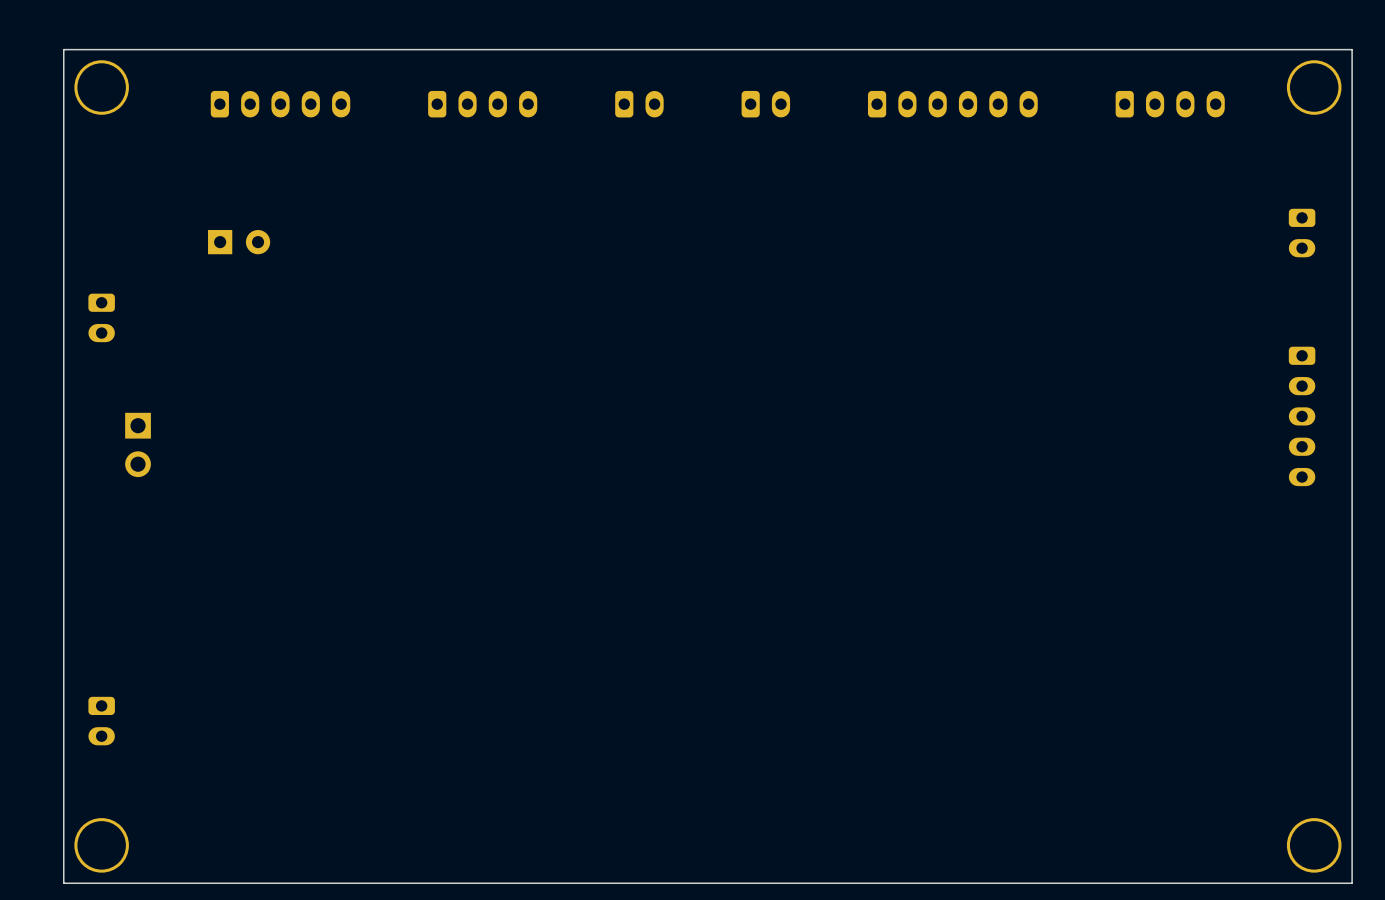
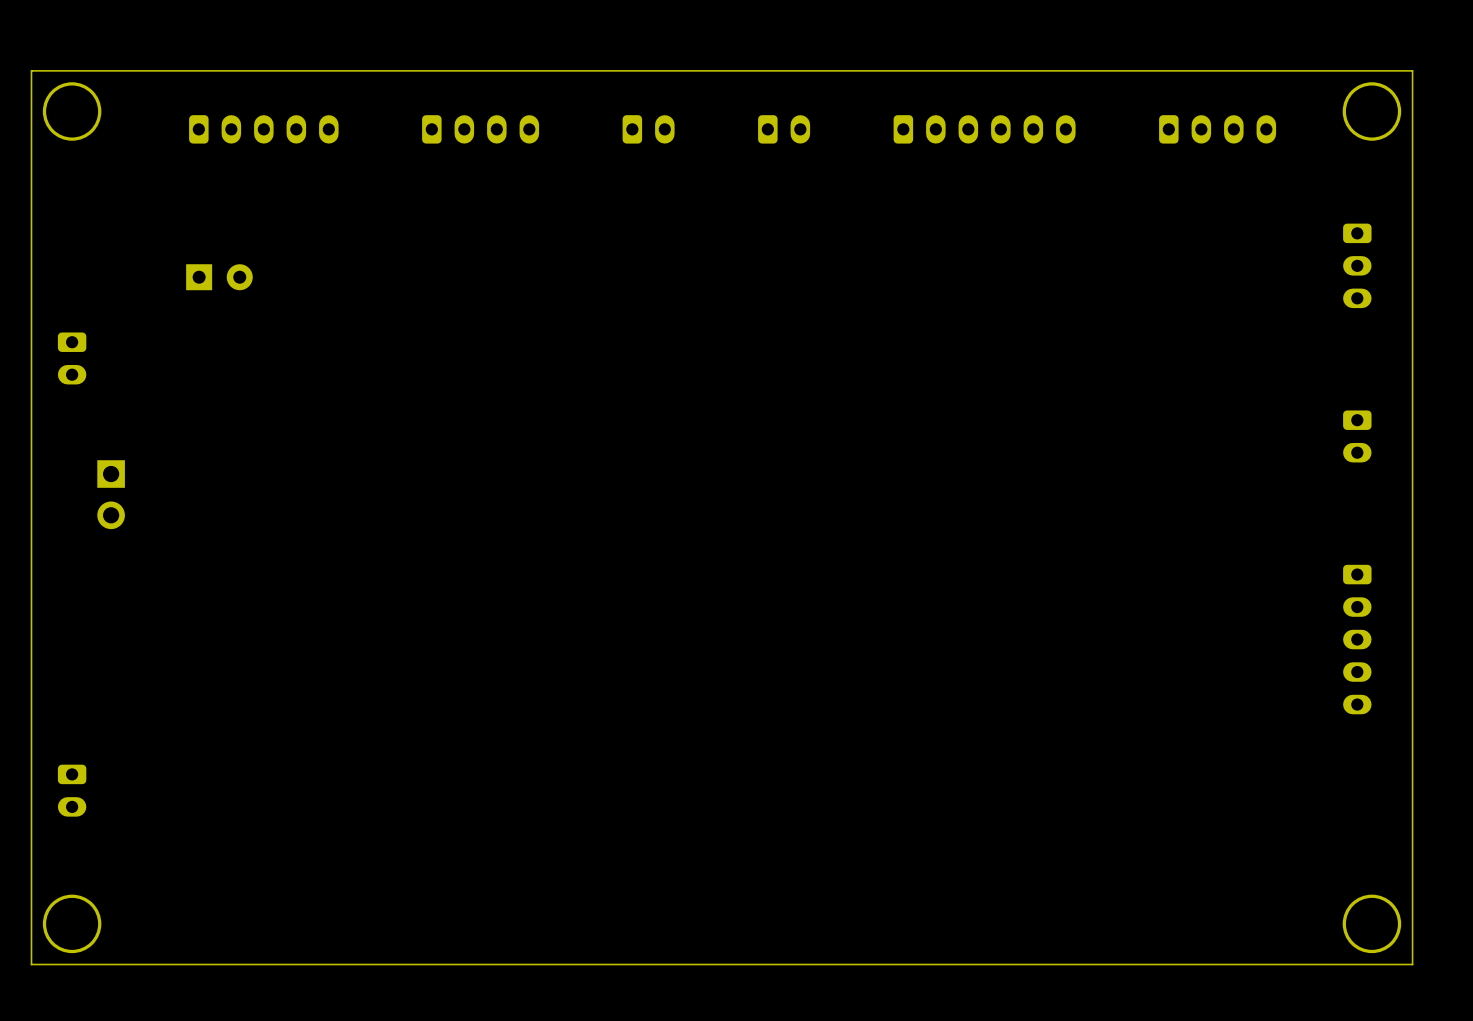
part footprint: [1288, 208, 1316, 258] -> [1343, 223, 1372, 309]
part: none -> (1357, 436)
part position: (1302, 416) -> (1357, 639)

